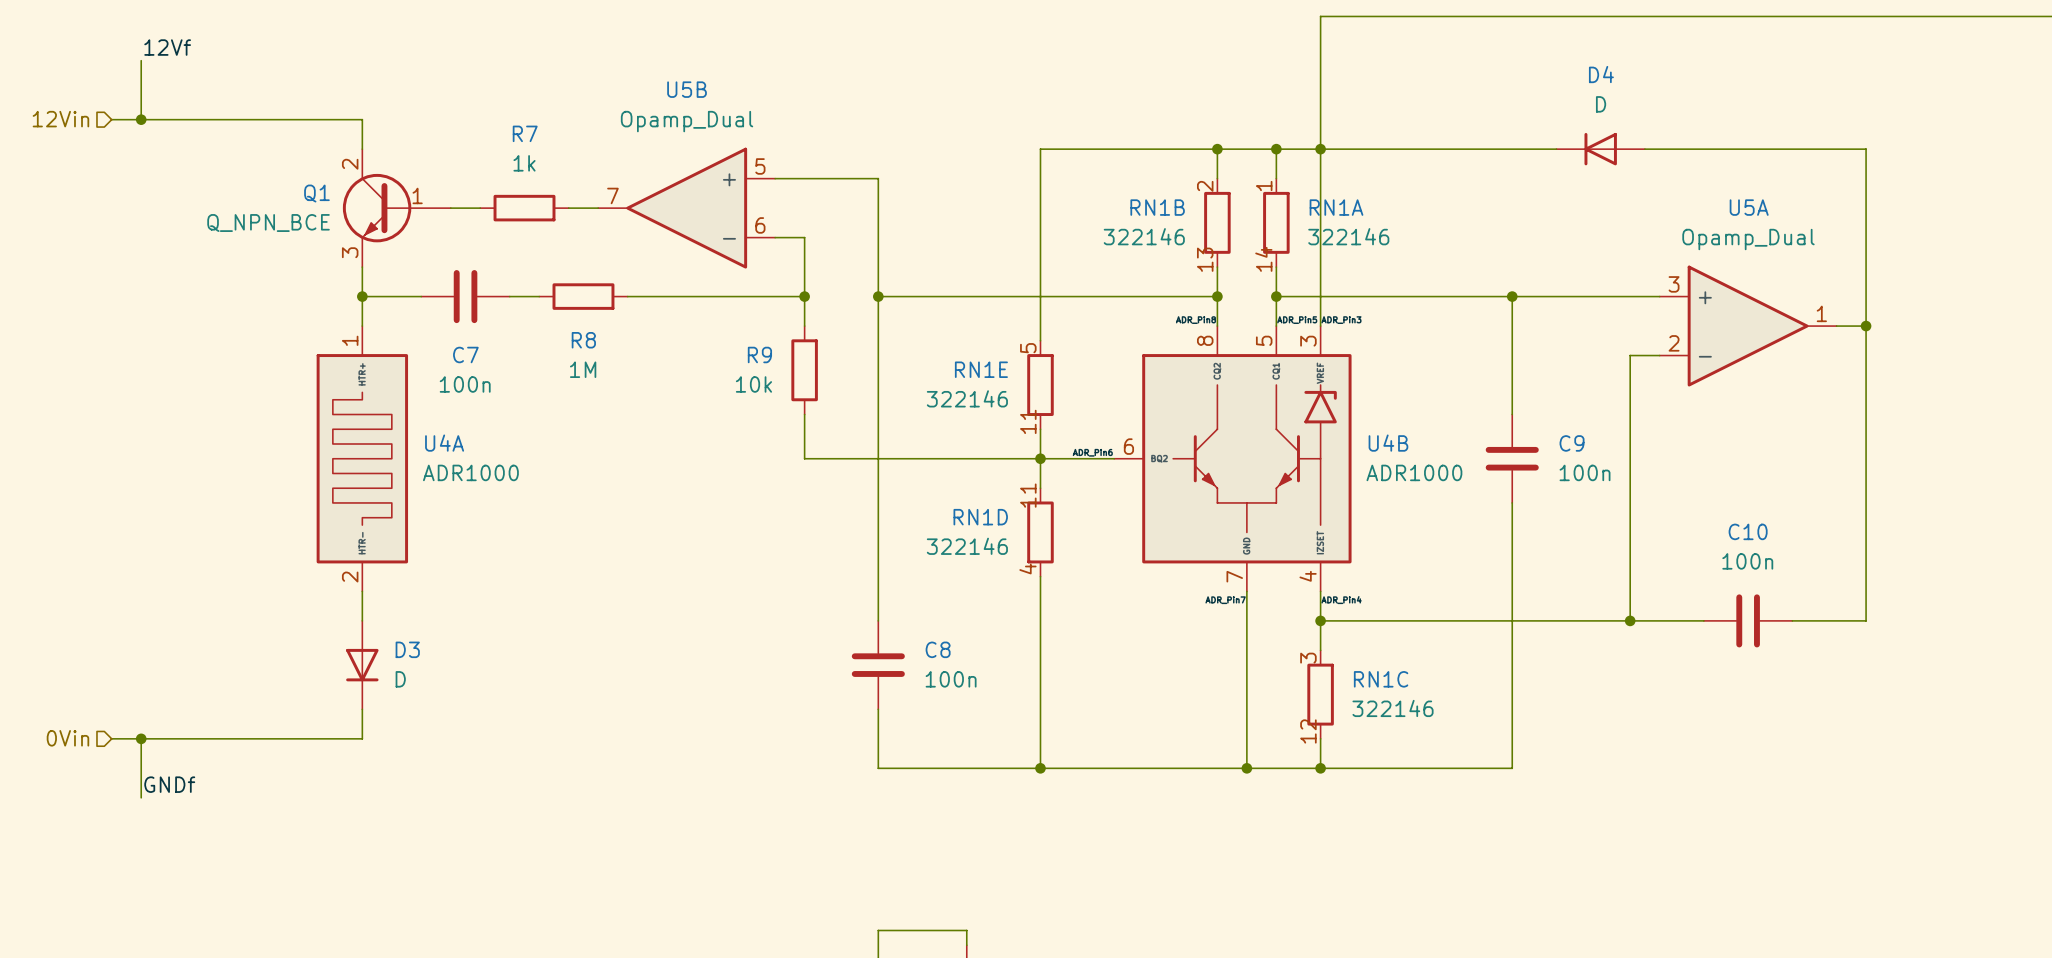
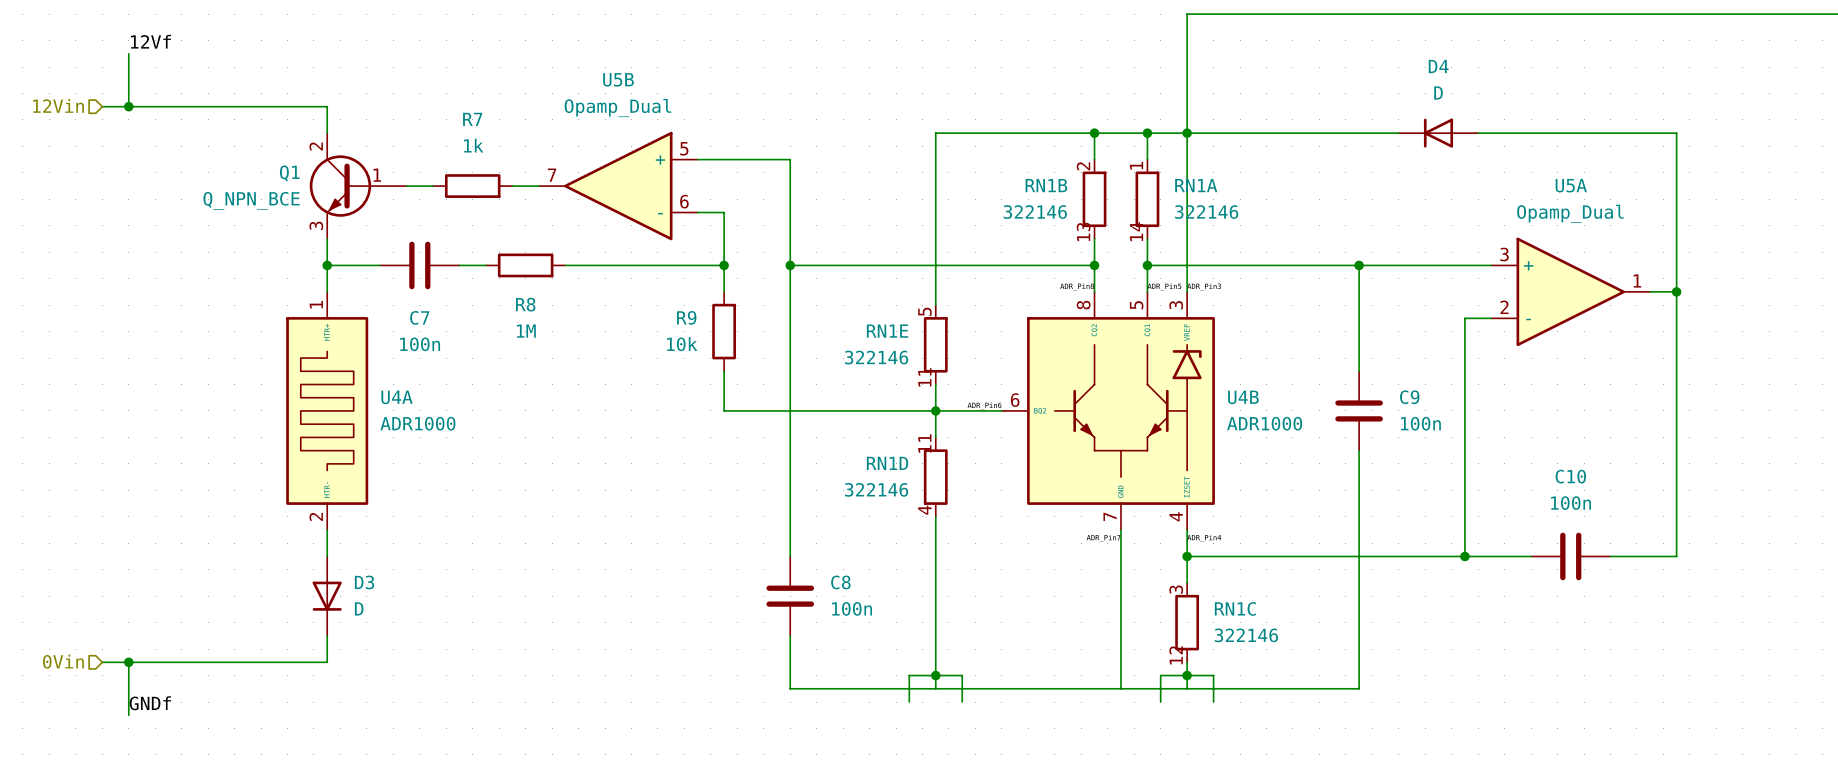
junction position: (1040, 768) -> (935, 675)
junction: (1246, 768) -> none
junction position: (1320, 768) -> (1187, 675)
wire: none -> (909, 702) (909, 675) (962, 675) (962, 702)
wire: none -> (1160, 702) (1160, 675) (1213, 675) (1213, 702)

